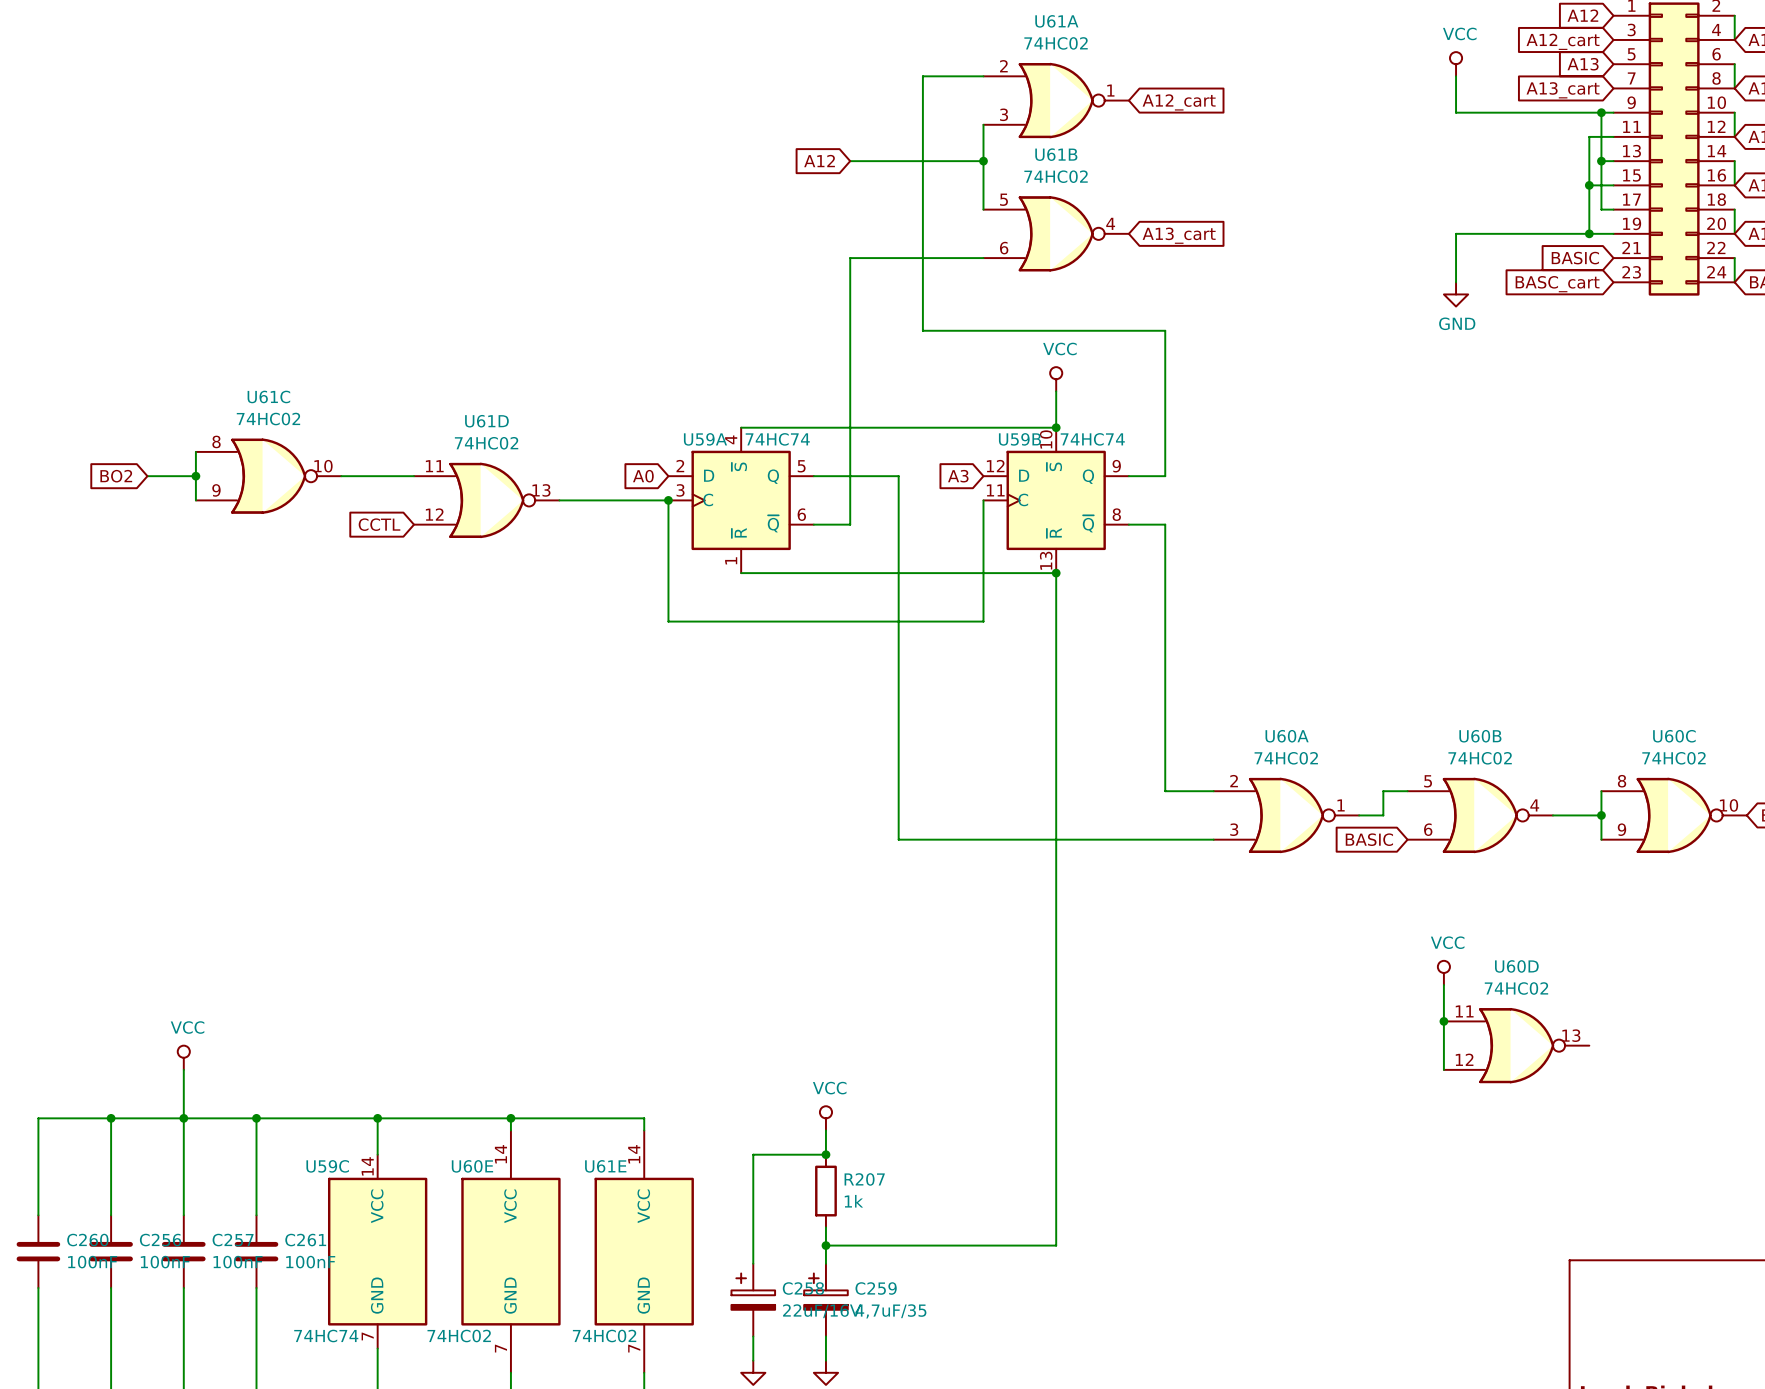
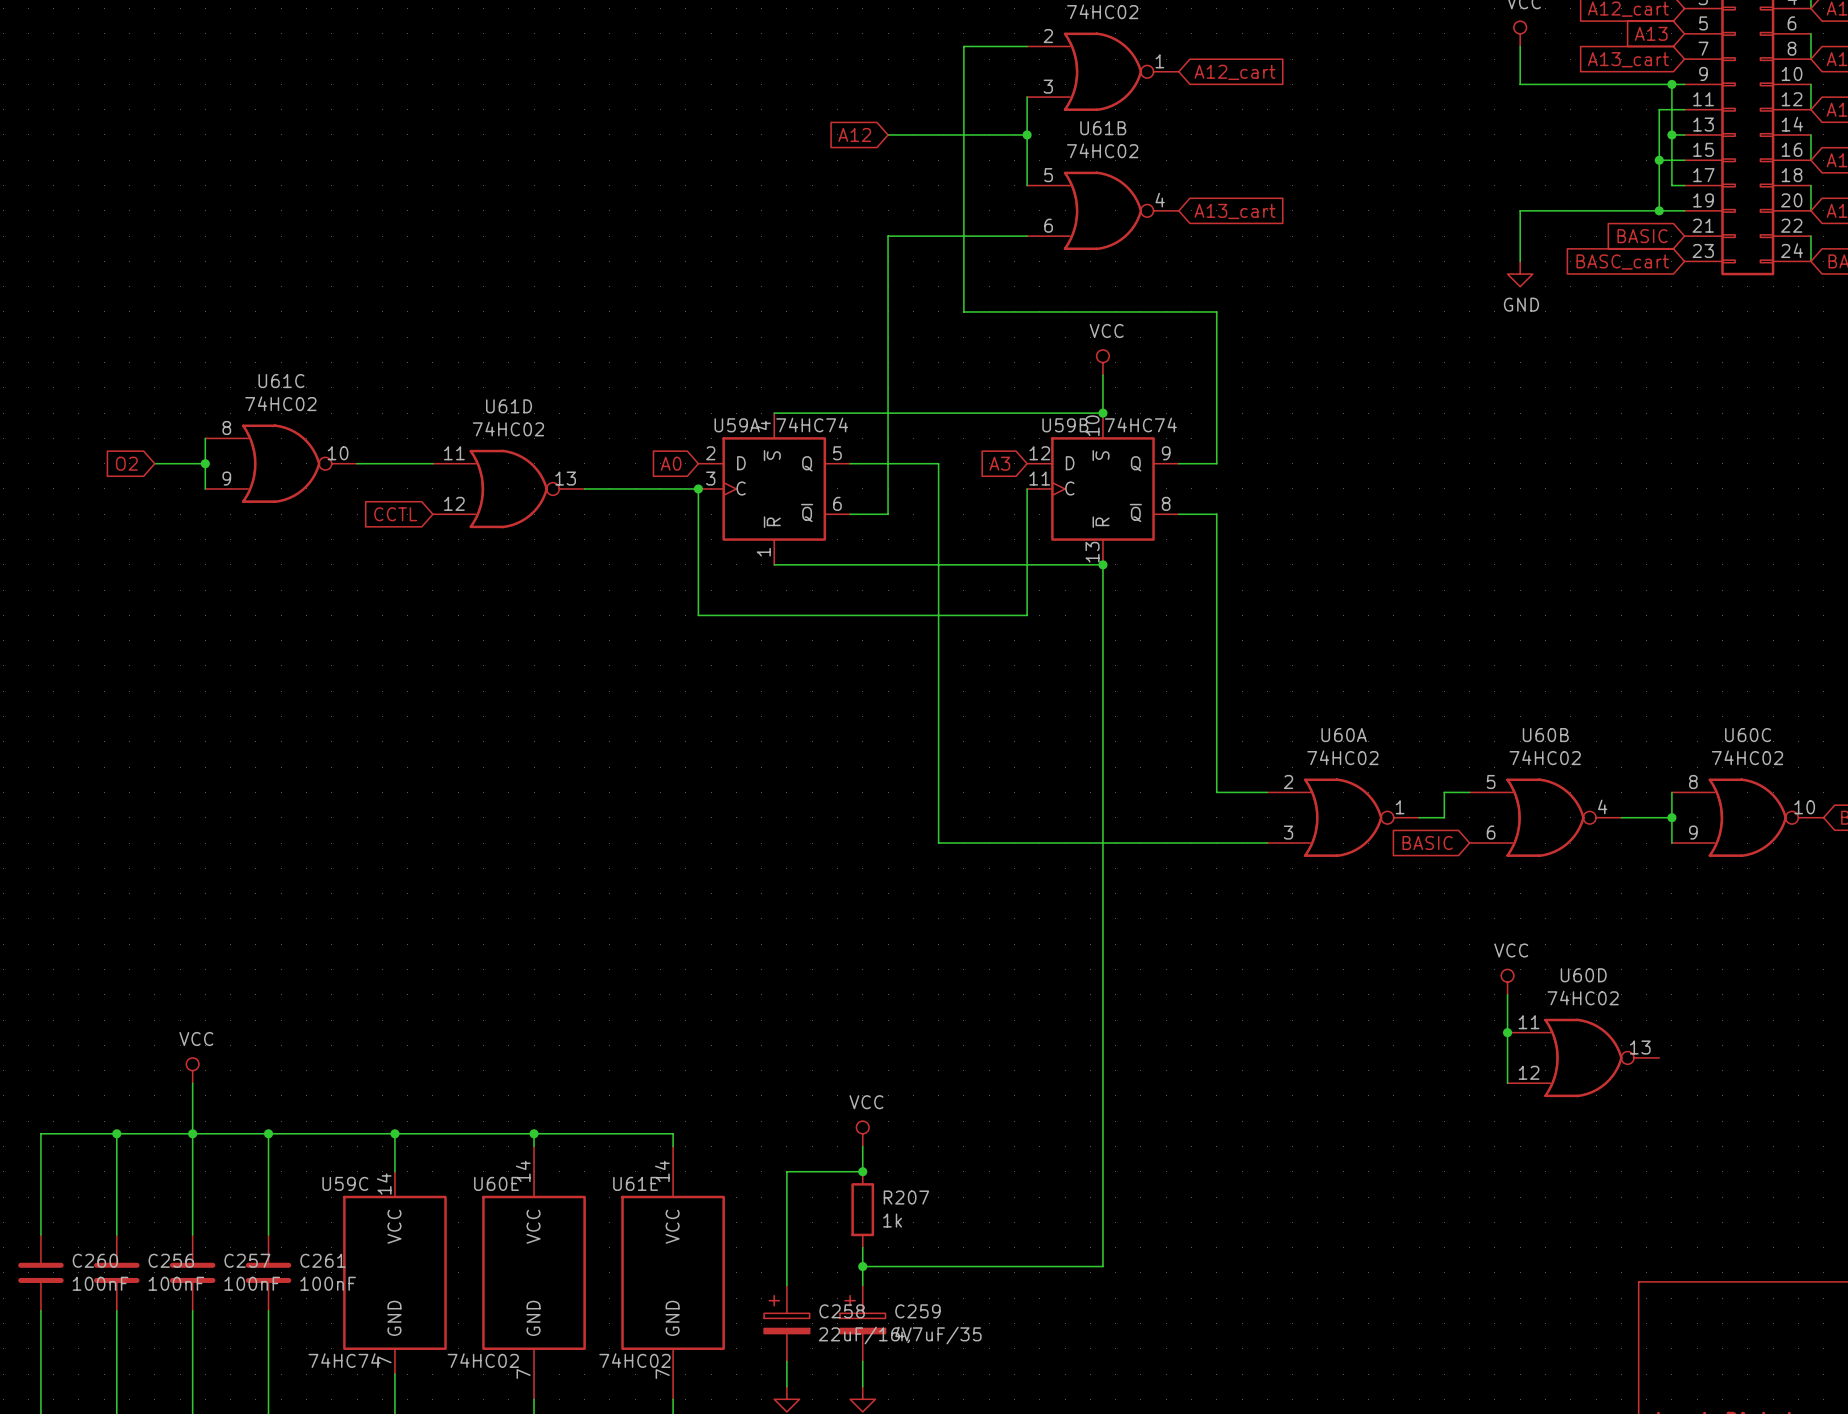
global label: BO2 (116, 476) -> O2 (126, 463)

